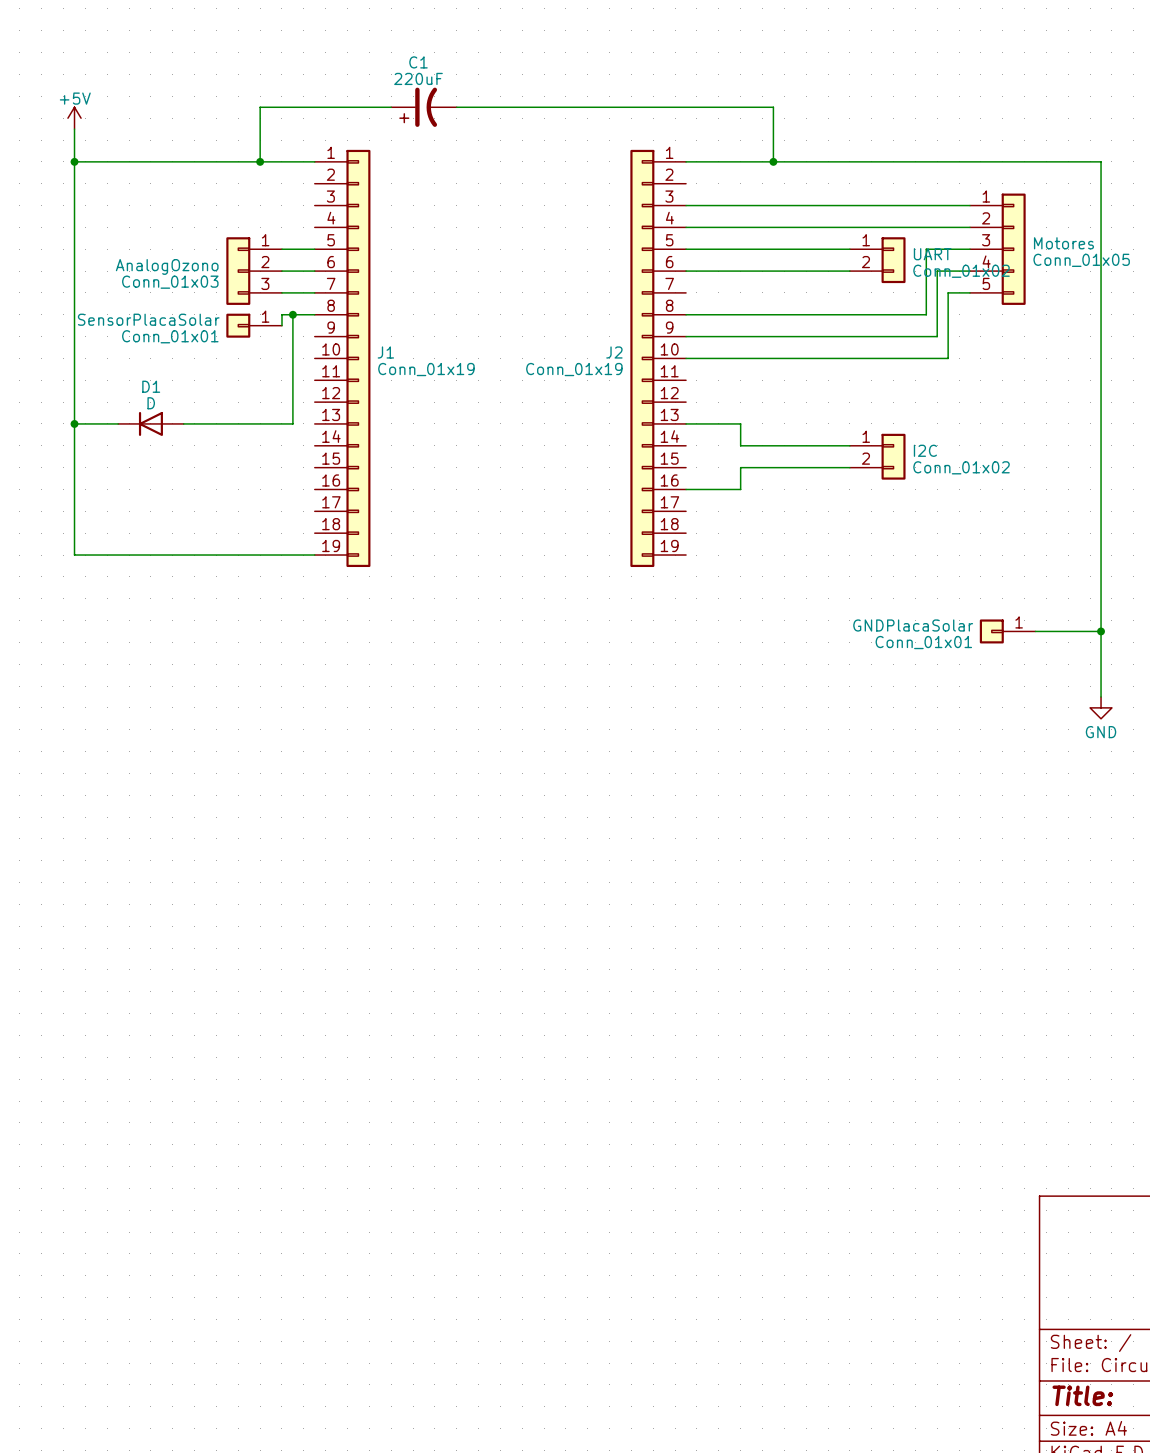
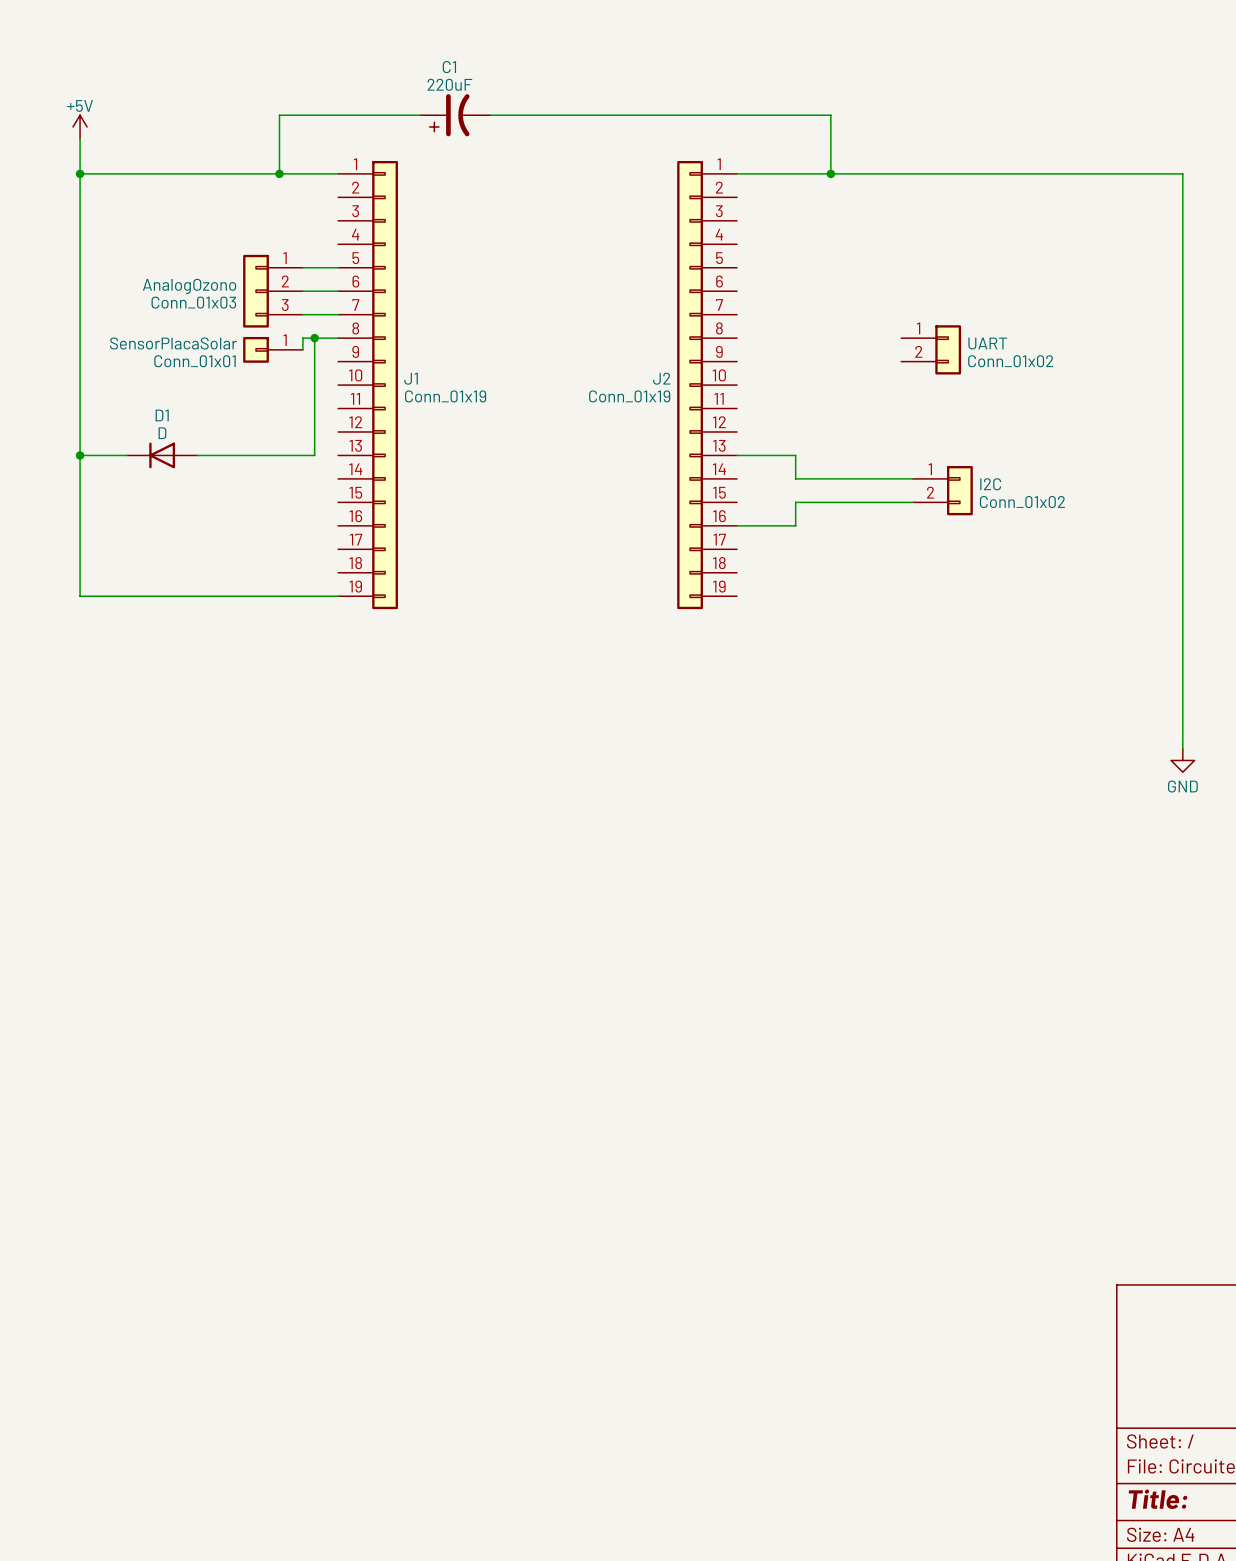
wire: (686, 205) (969, 205) -> none
wire: (686, 227) (969, 227) -> none
wire: (686, 249) (849, 249) -> none
wire: (969, 249) (926, 249) (926, 314) (686, 314) -> none
Motores: Conn_01x05 (997, 249) -> none
UART position: (877, 260) -> (931, 349)
wire: (686, 271) (849, 271) -> none
wire: (969, 271) (937, 271) (937, 336) (686, 336) -> none
wire: (969, 292) (948, 292) (948, 358) (686, 358) -> none
GNDPlacaSolar: Conn_01x01 (1007, 631) -> none
wire: (1035, 631) (1101, 631) -> none
junction: (1101, 631) -> none

